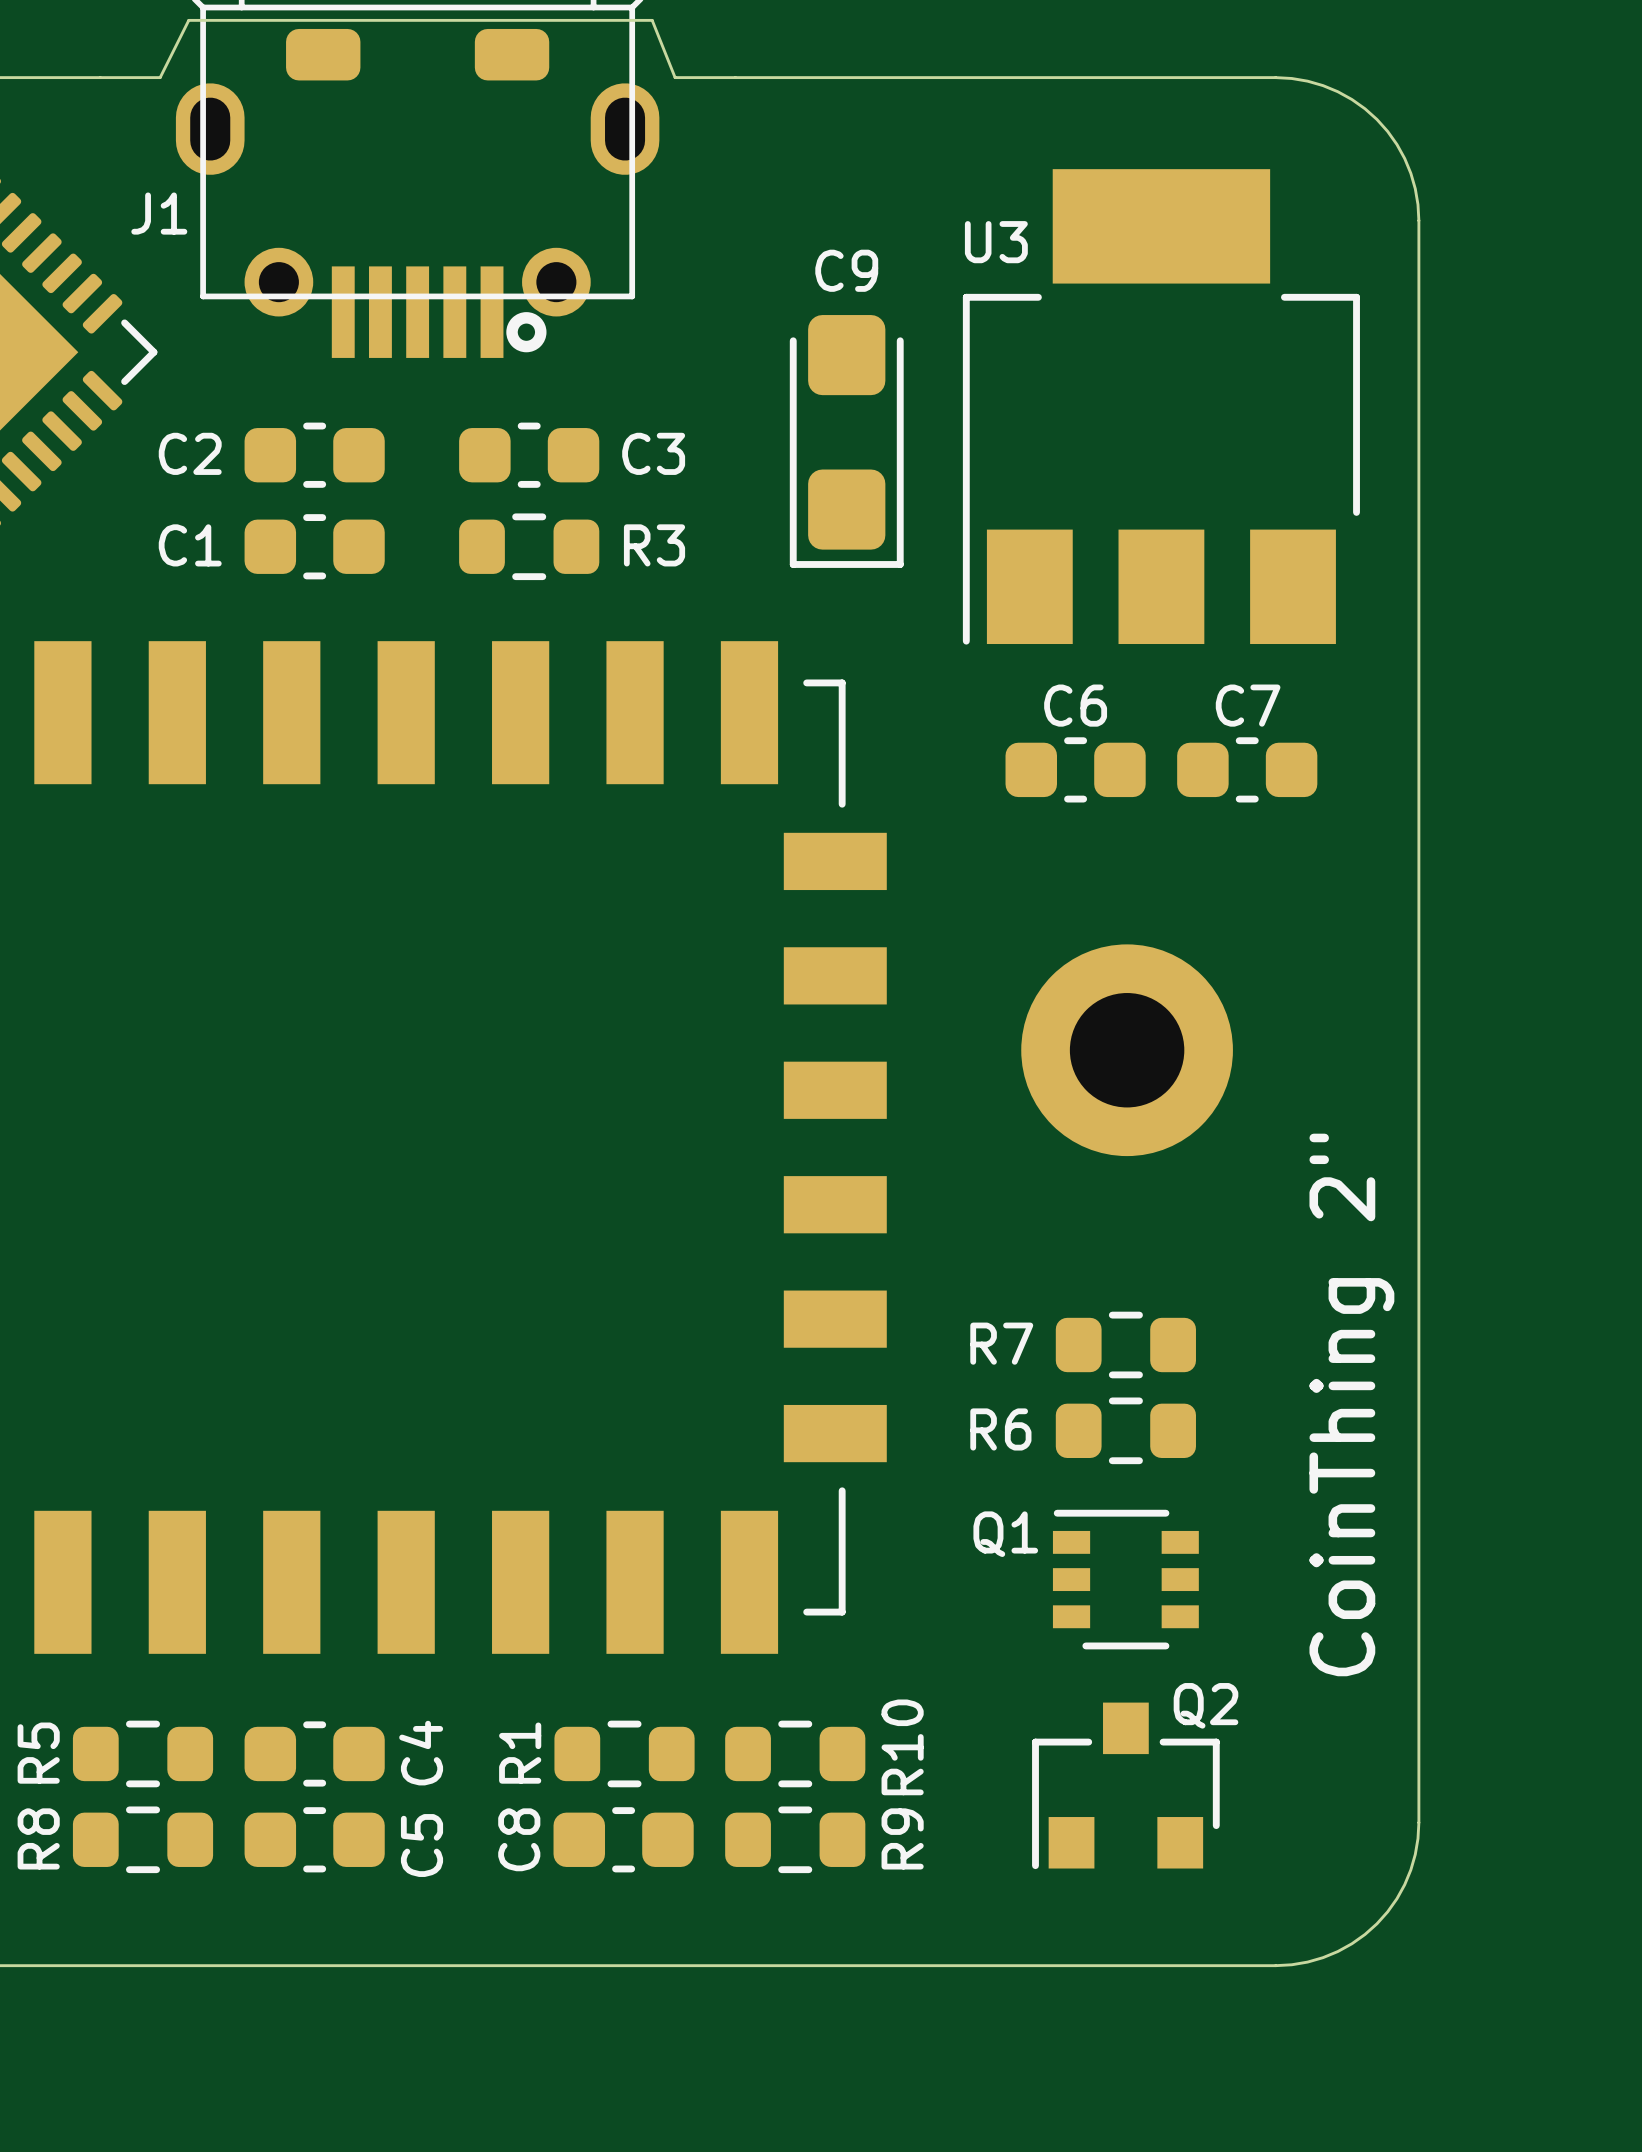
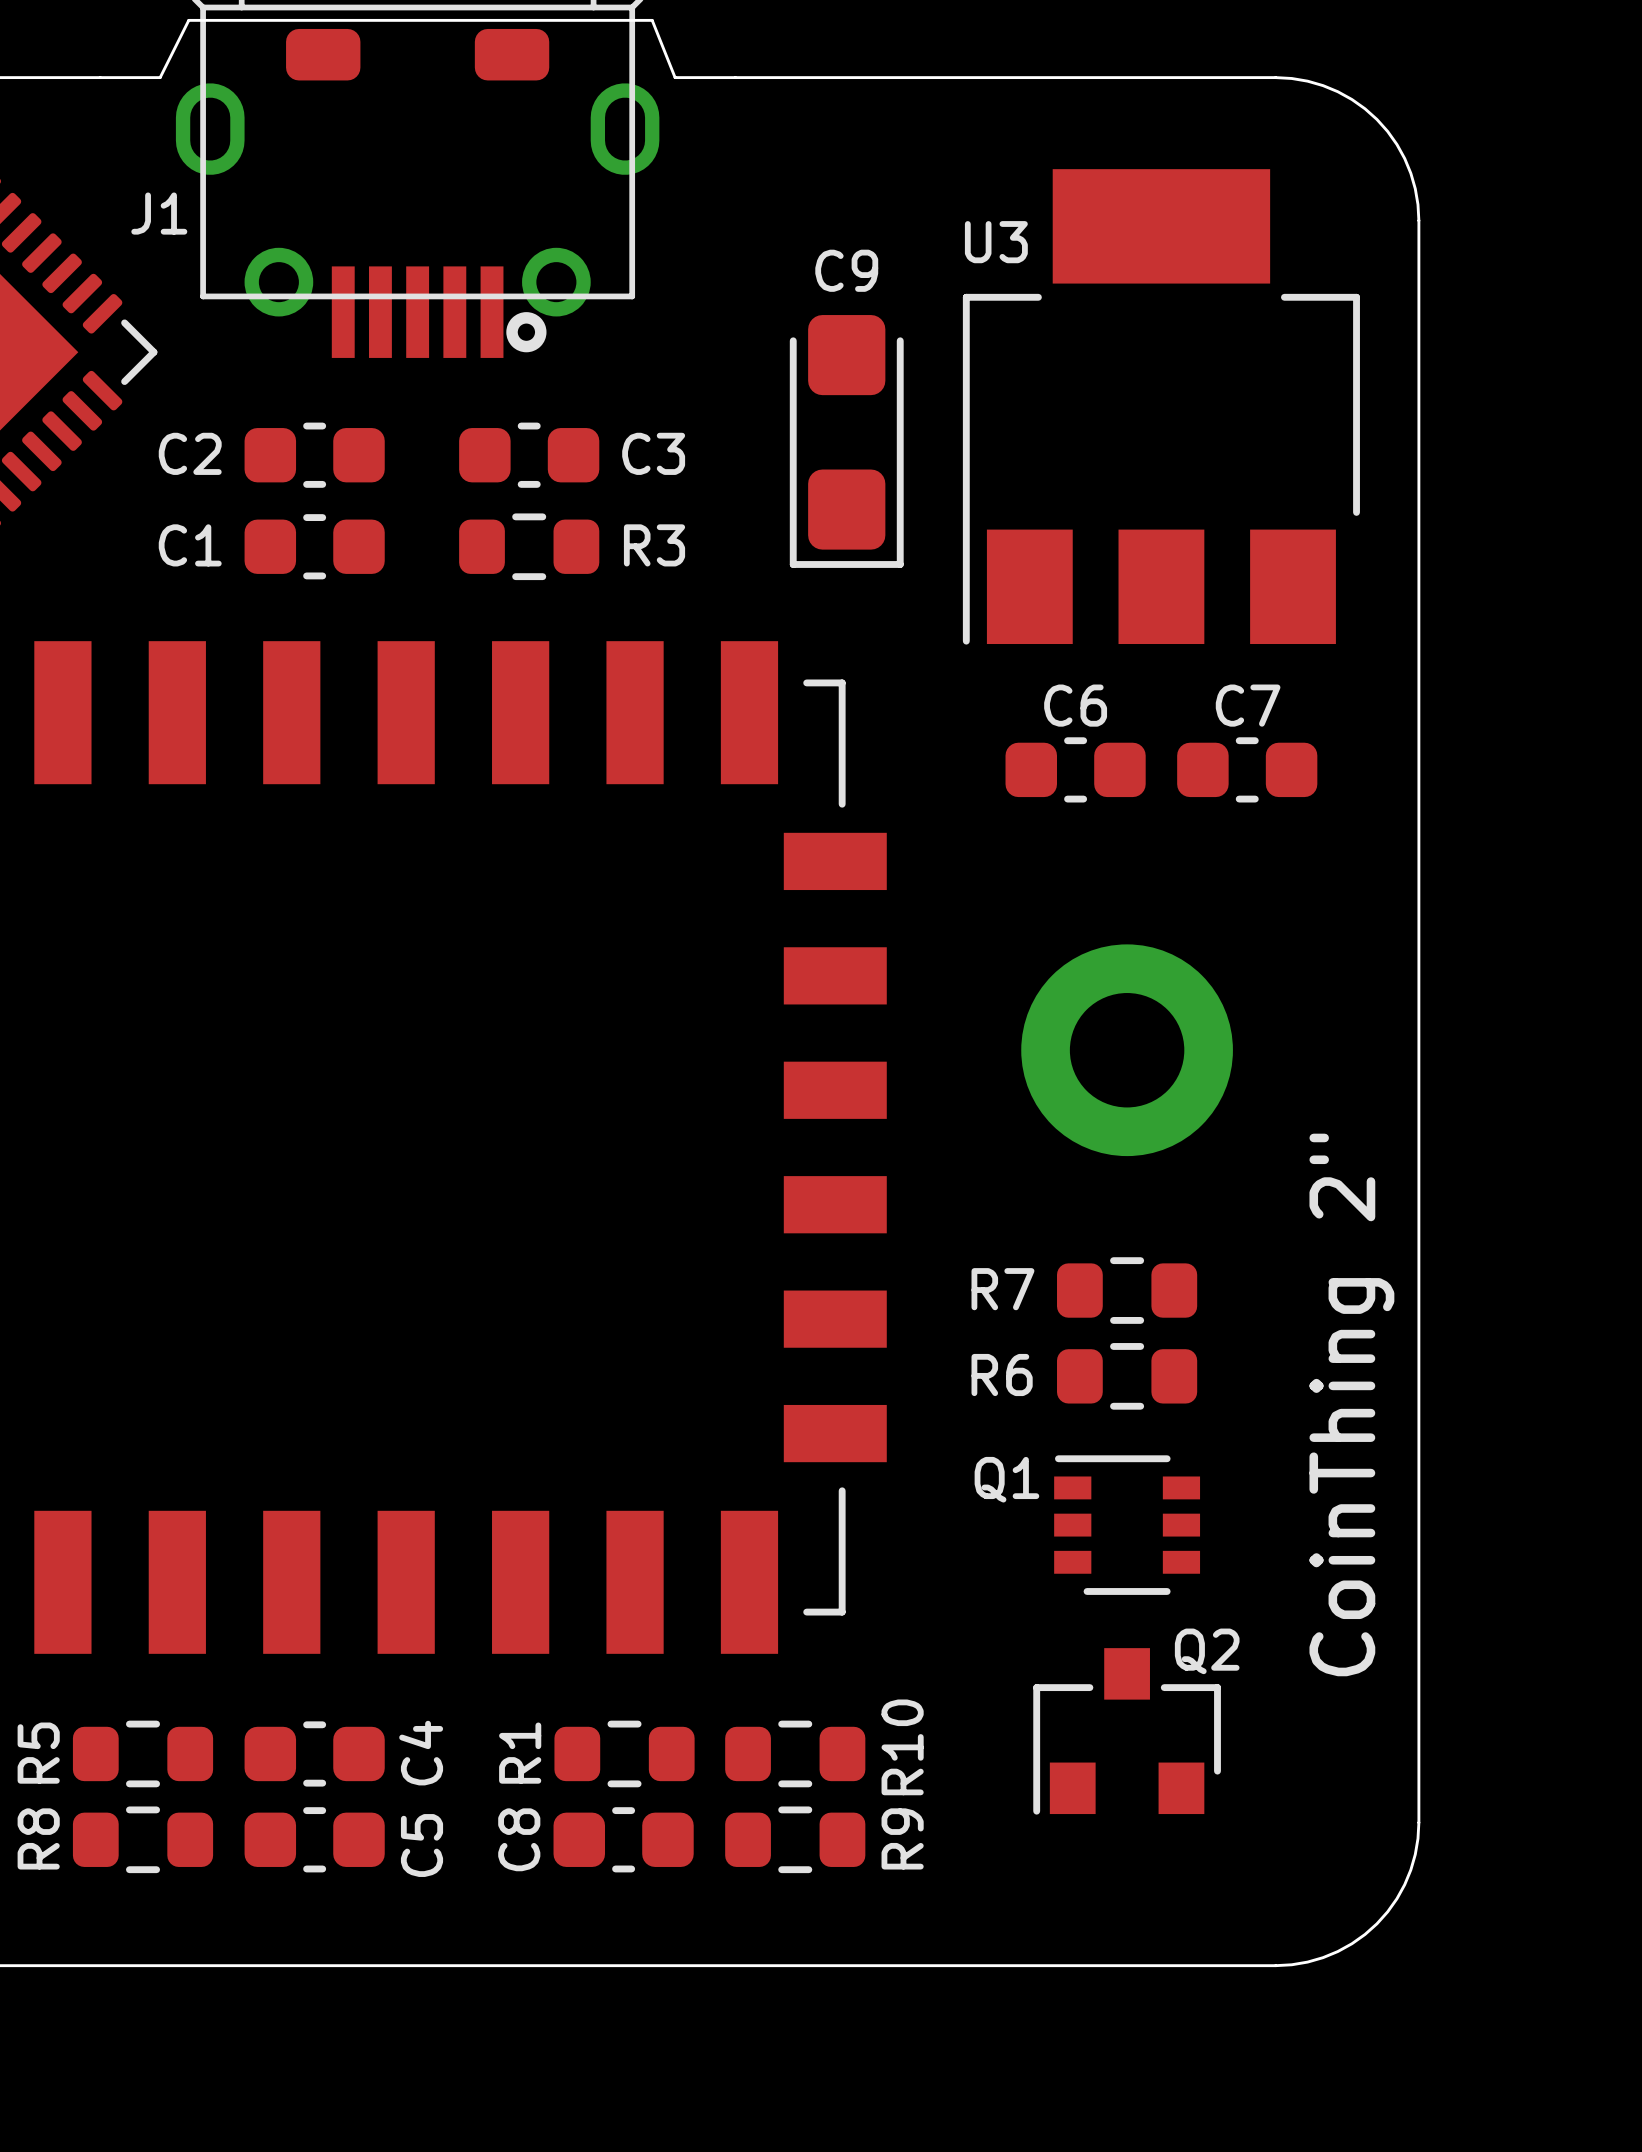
R7 position: (1125, 1345) -> (1127, 1290)
R6 position: (1125, 1430) -> (1127, 1376)
Q1 position: (1125, 1579) -> (1127, 1525)
Q2 position: (1125, 1785) -> (1127, 1731)

